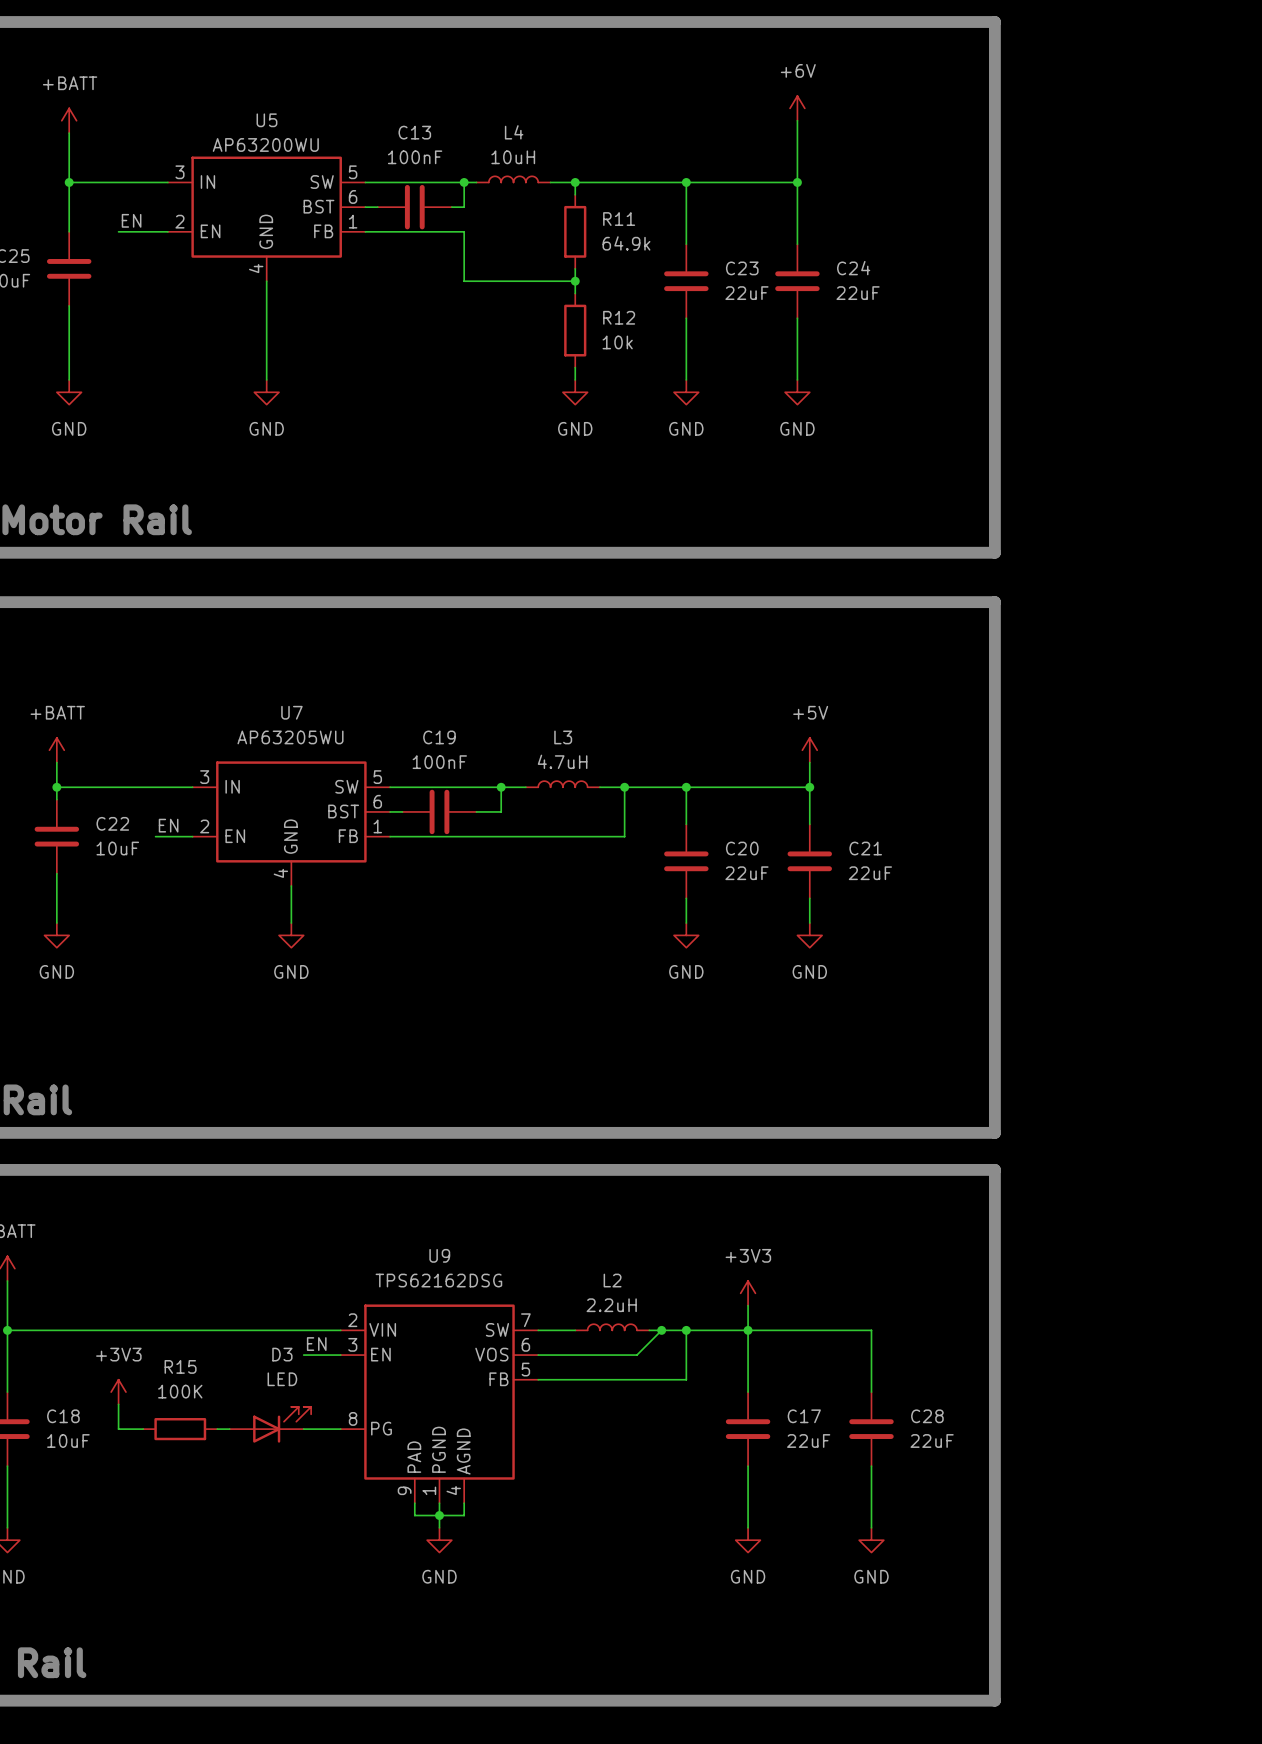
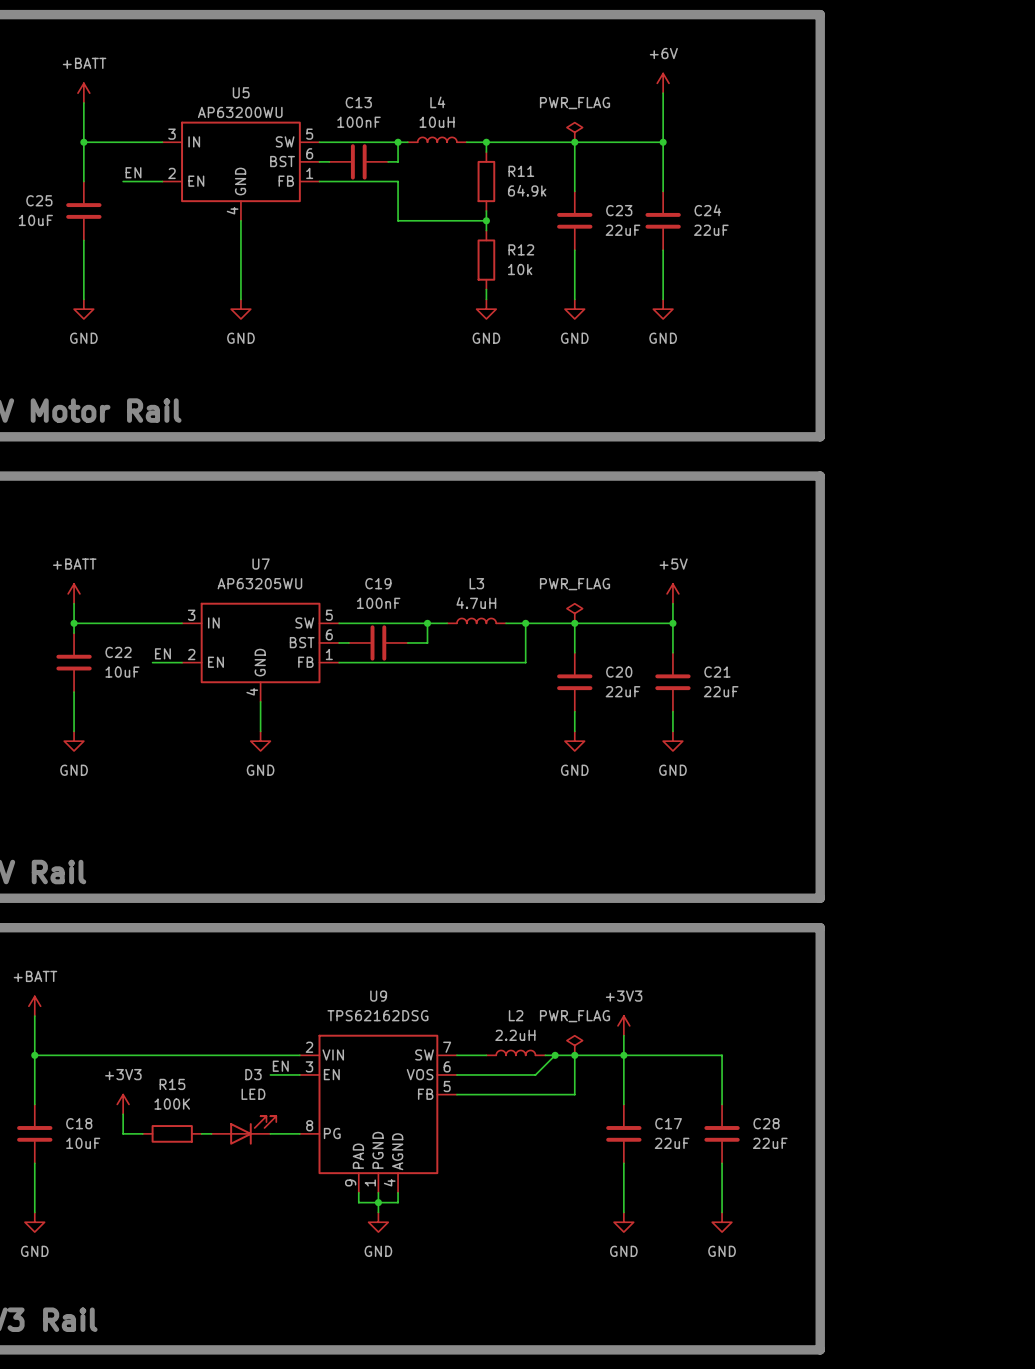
power symbol: none -> PWR_FLAG (574, 132)
power symbol: none -> PWR_FLAG (574, 613)
power symbol: none -> PWR_FLAG (574, 1045)

